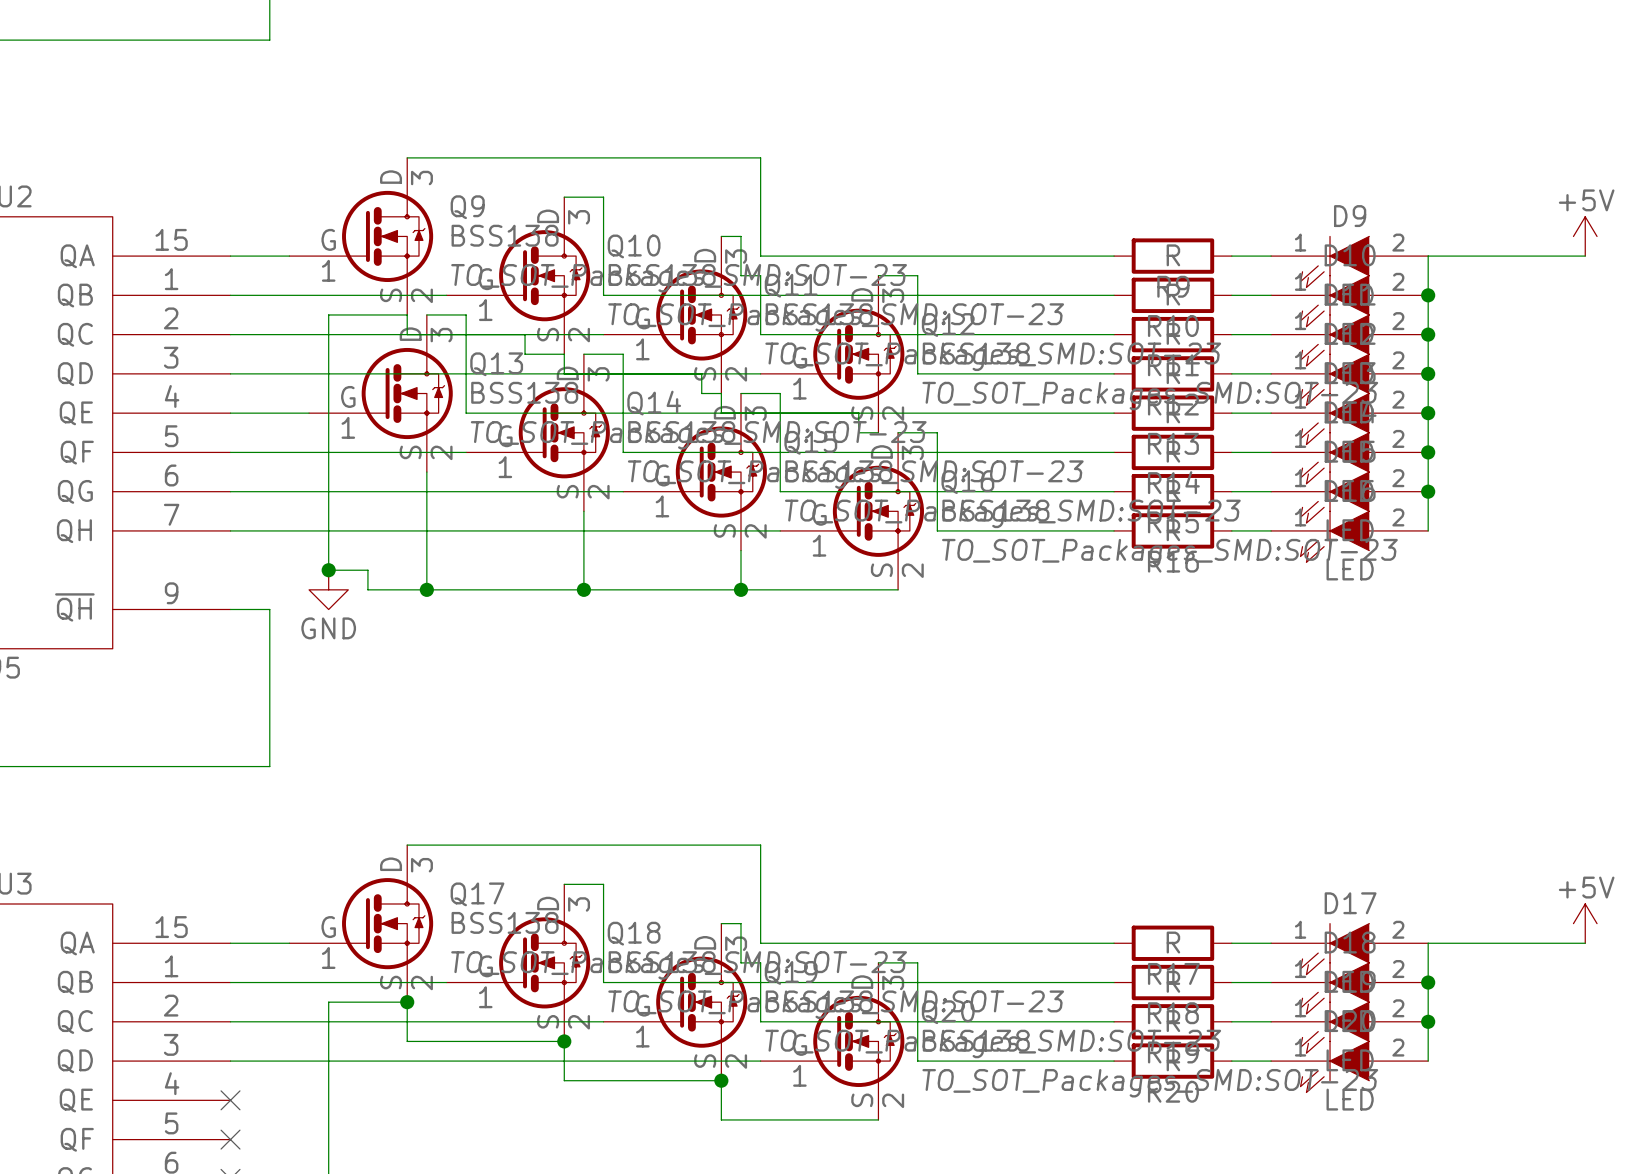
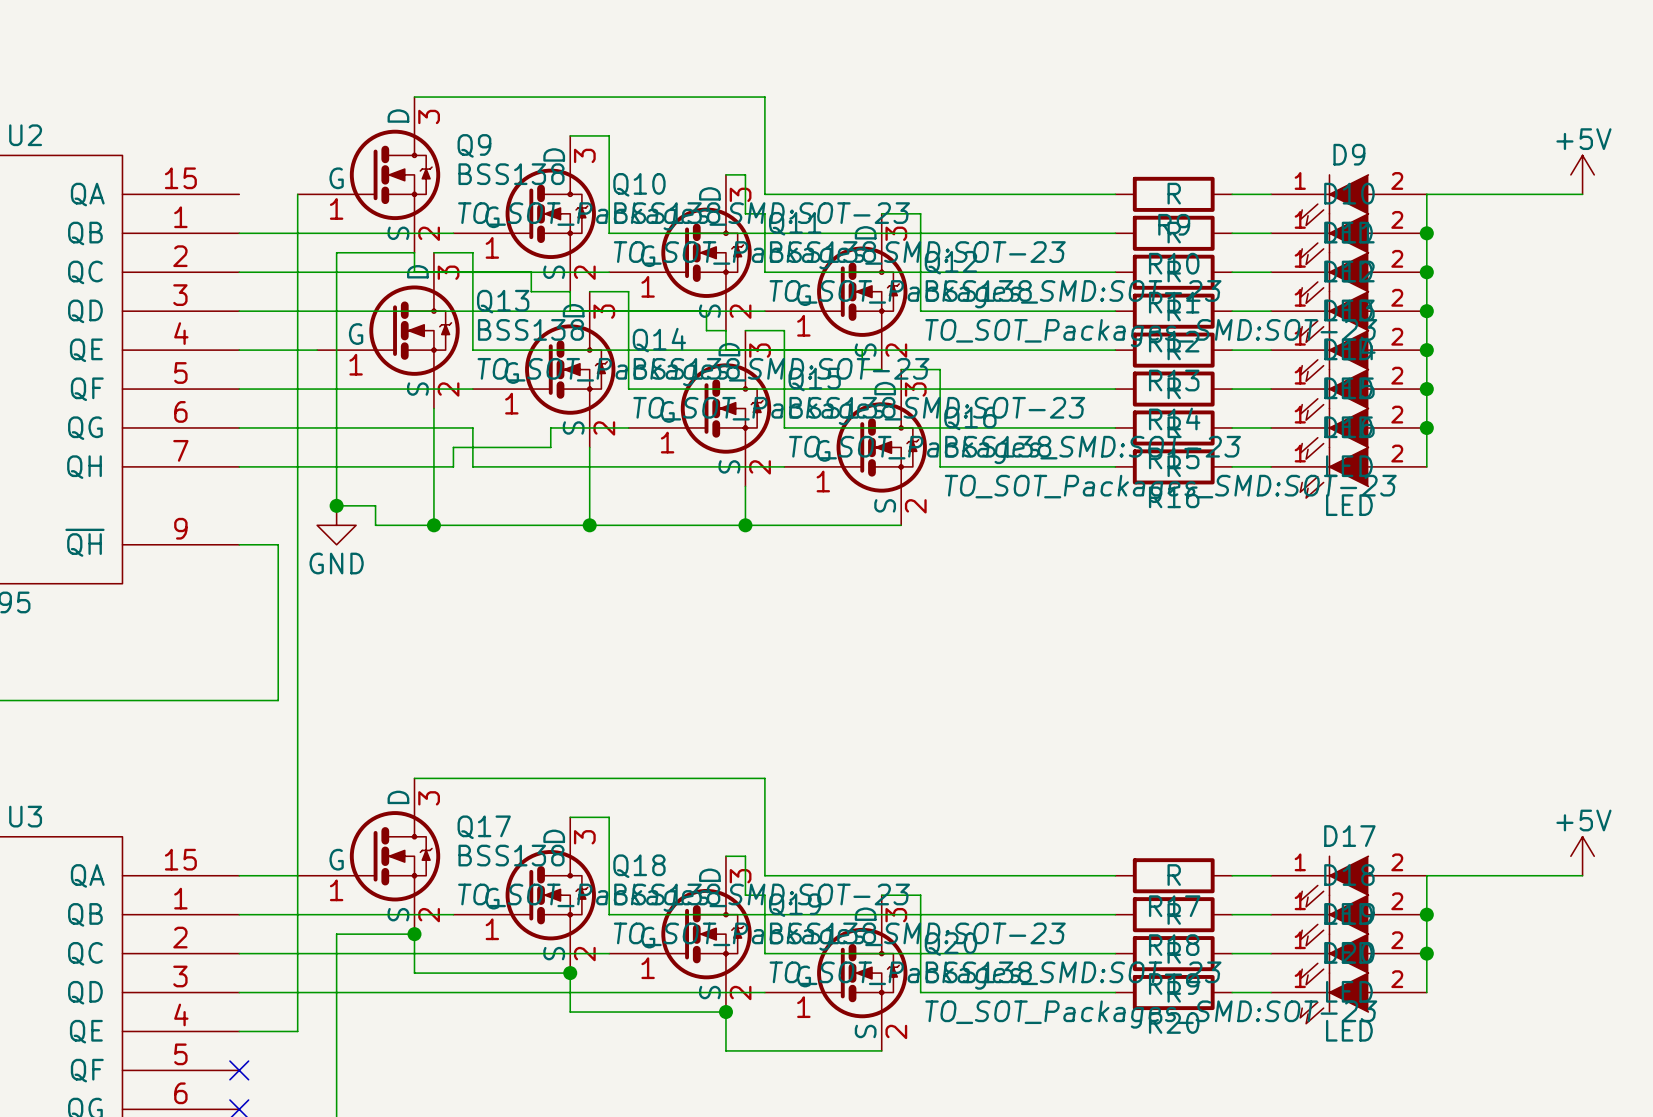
wire: (230, 256) (289, 256) -> (239, 1031) (297, 1031) (297, 194)
wire: (466, 491) (544, 491) -> (453, 466) (453, 447) (550, 447) (550, 427)
wire: (446, 530) (466, 530) -> (472, 427) (472, 466)
no-connect mark: (230, 1100) -> none

